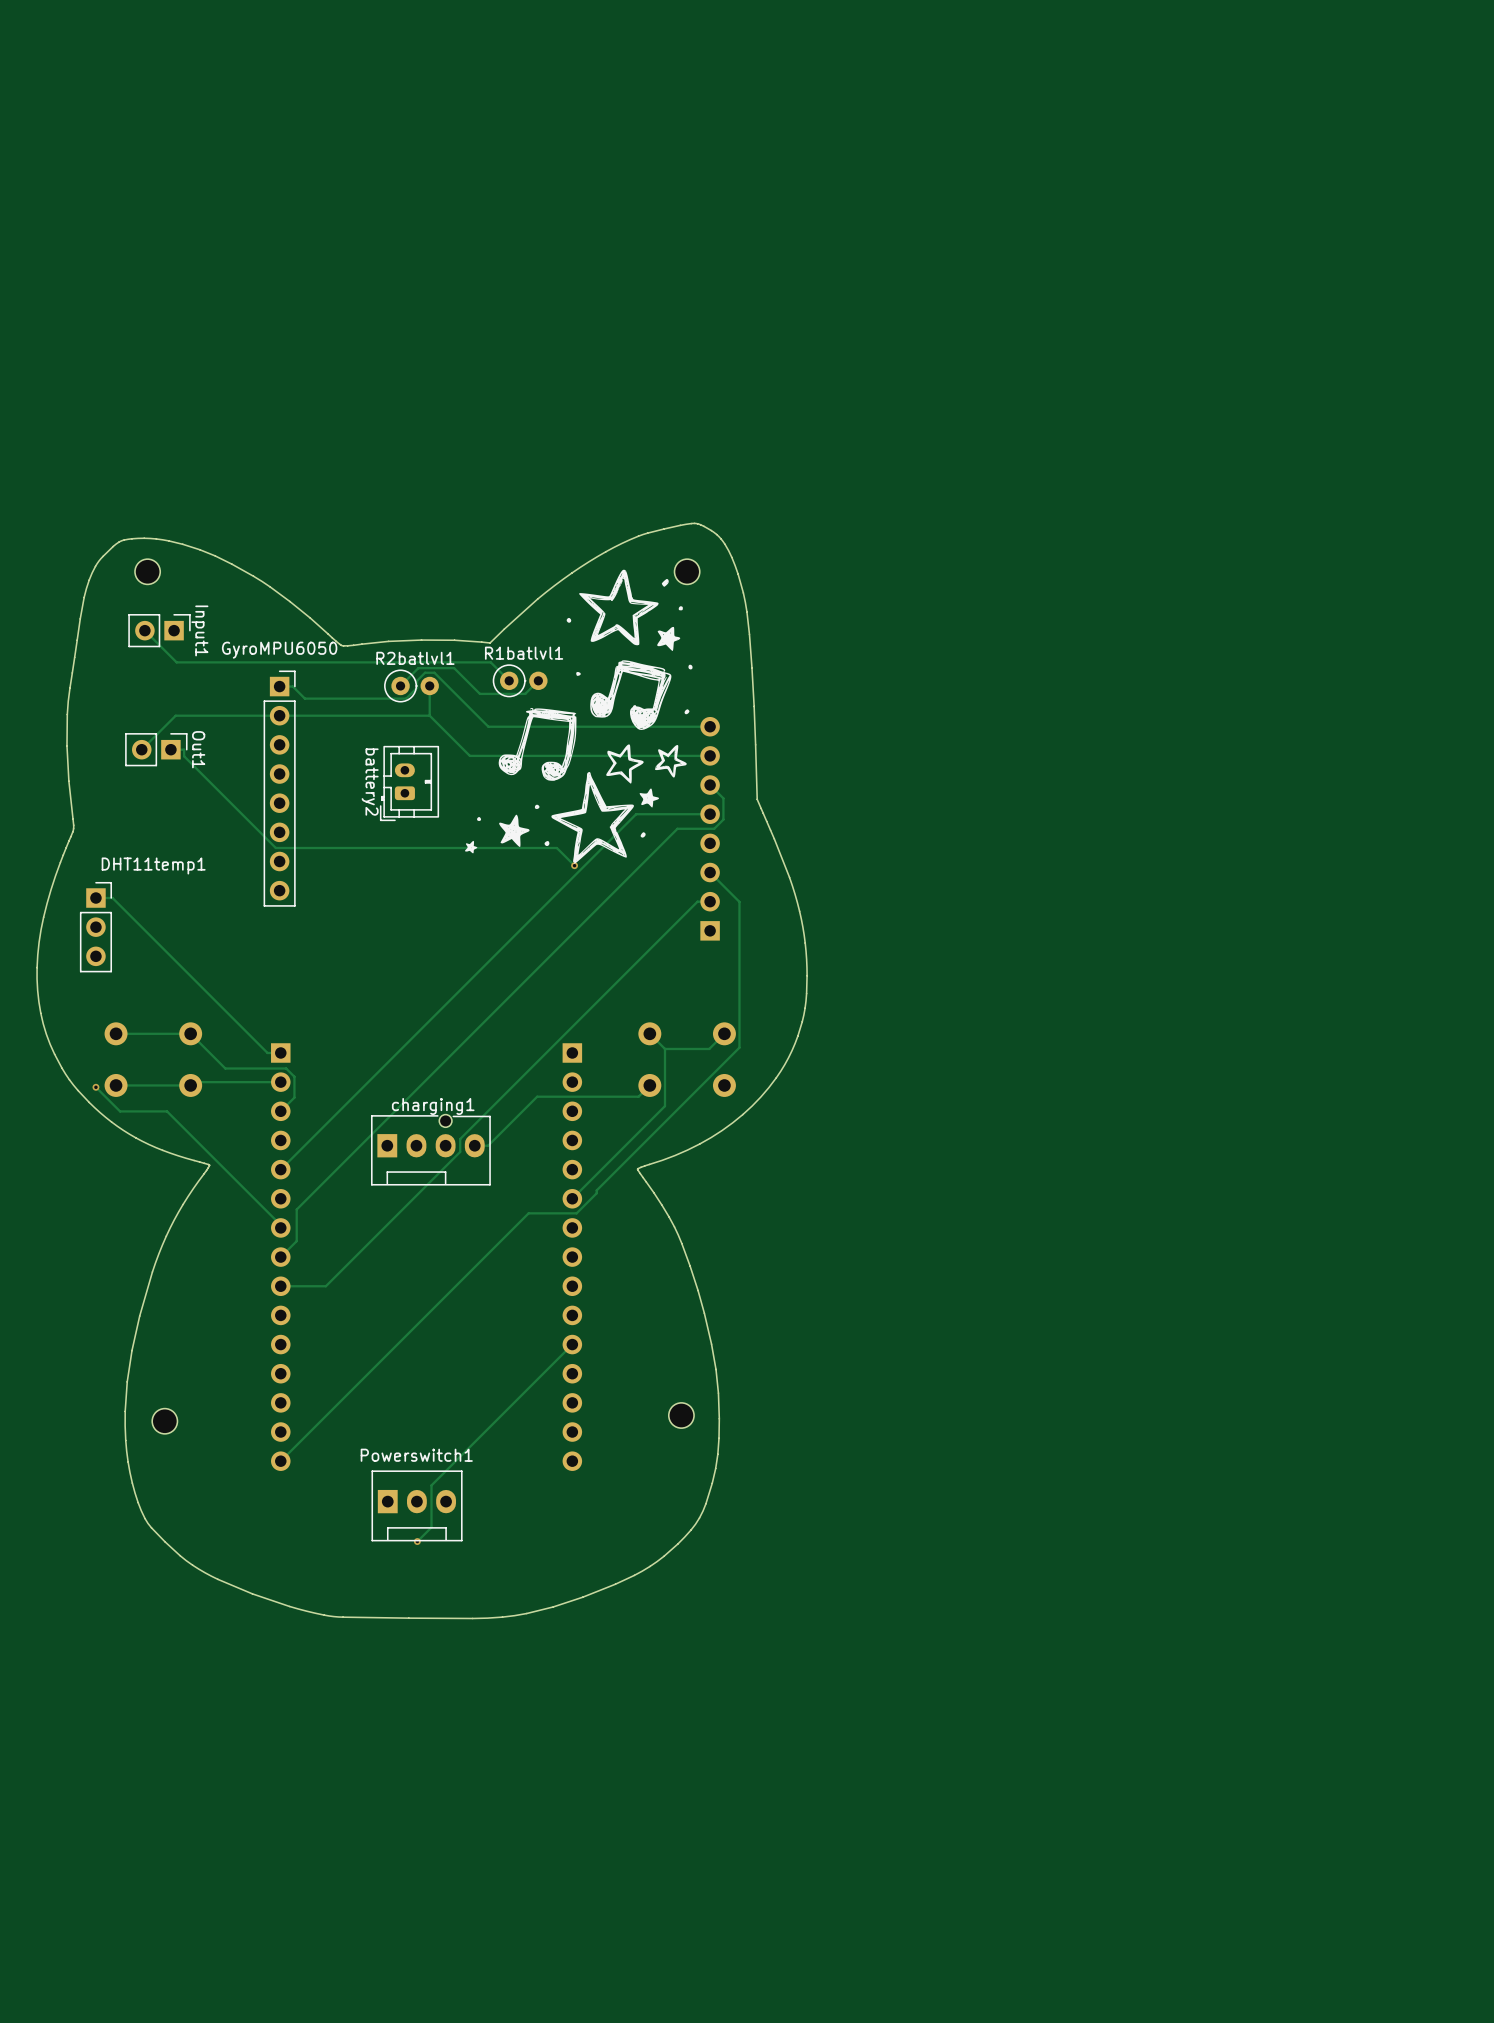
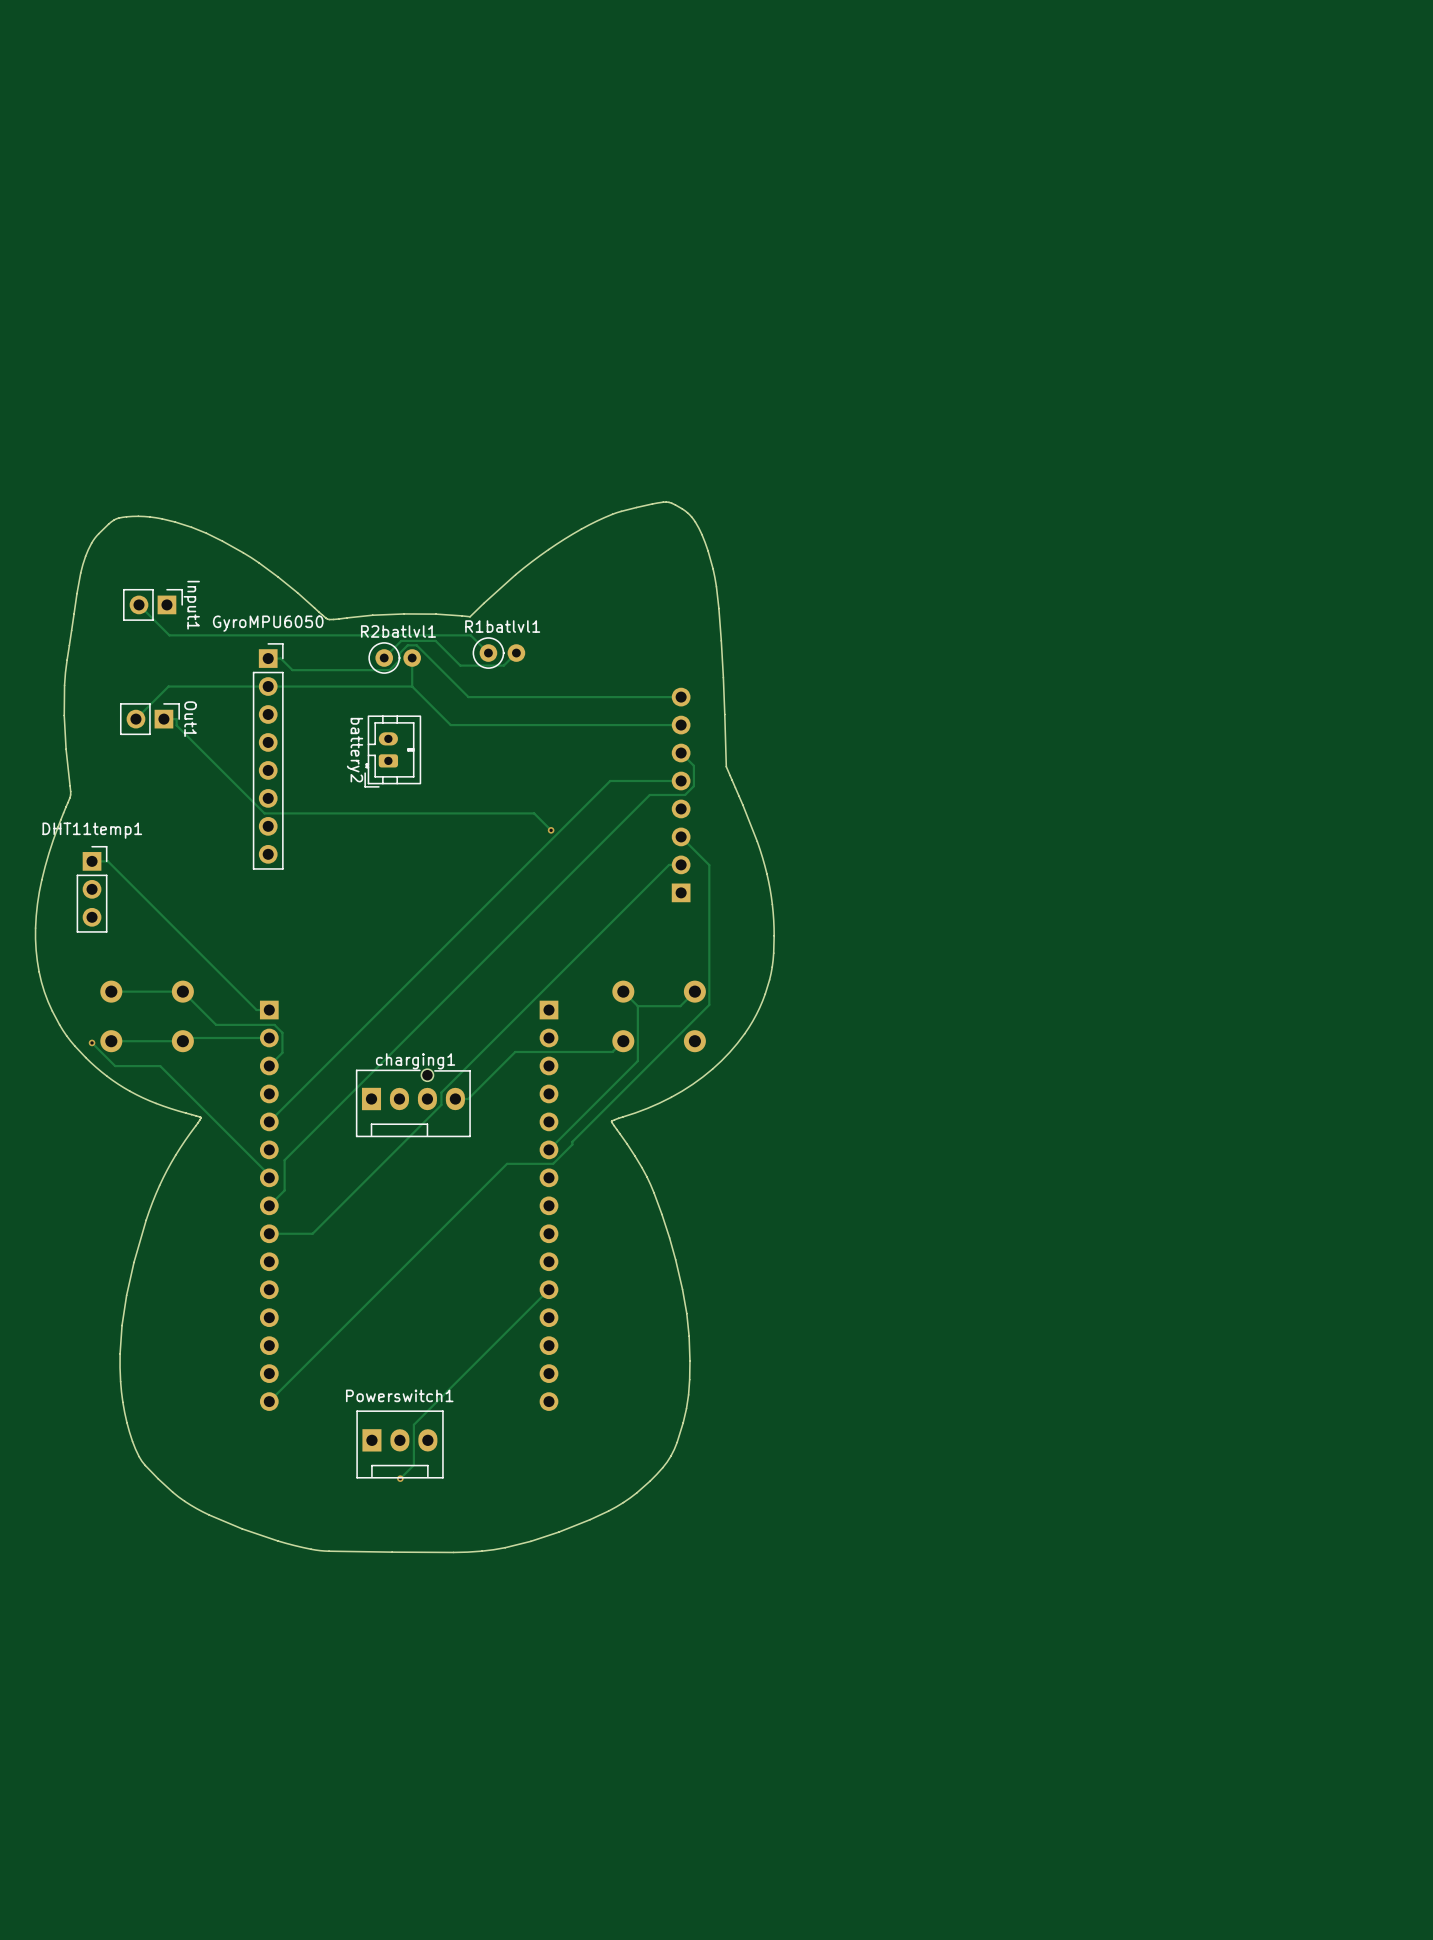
drawing: [464, 569, 693, 864] -> none
part: (147, 571) -> none
part: (687, 571) -> none
DHT11temp1 name position: DHT11temp1 (153, 865) -> DHT11temp1 (92, 830)
part: (681, 1415) -> none
part: (164, 1421) -> none

